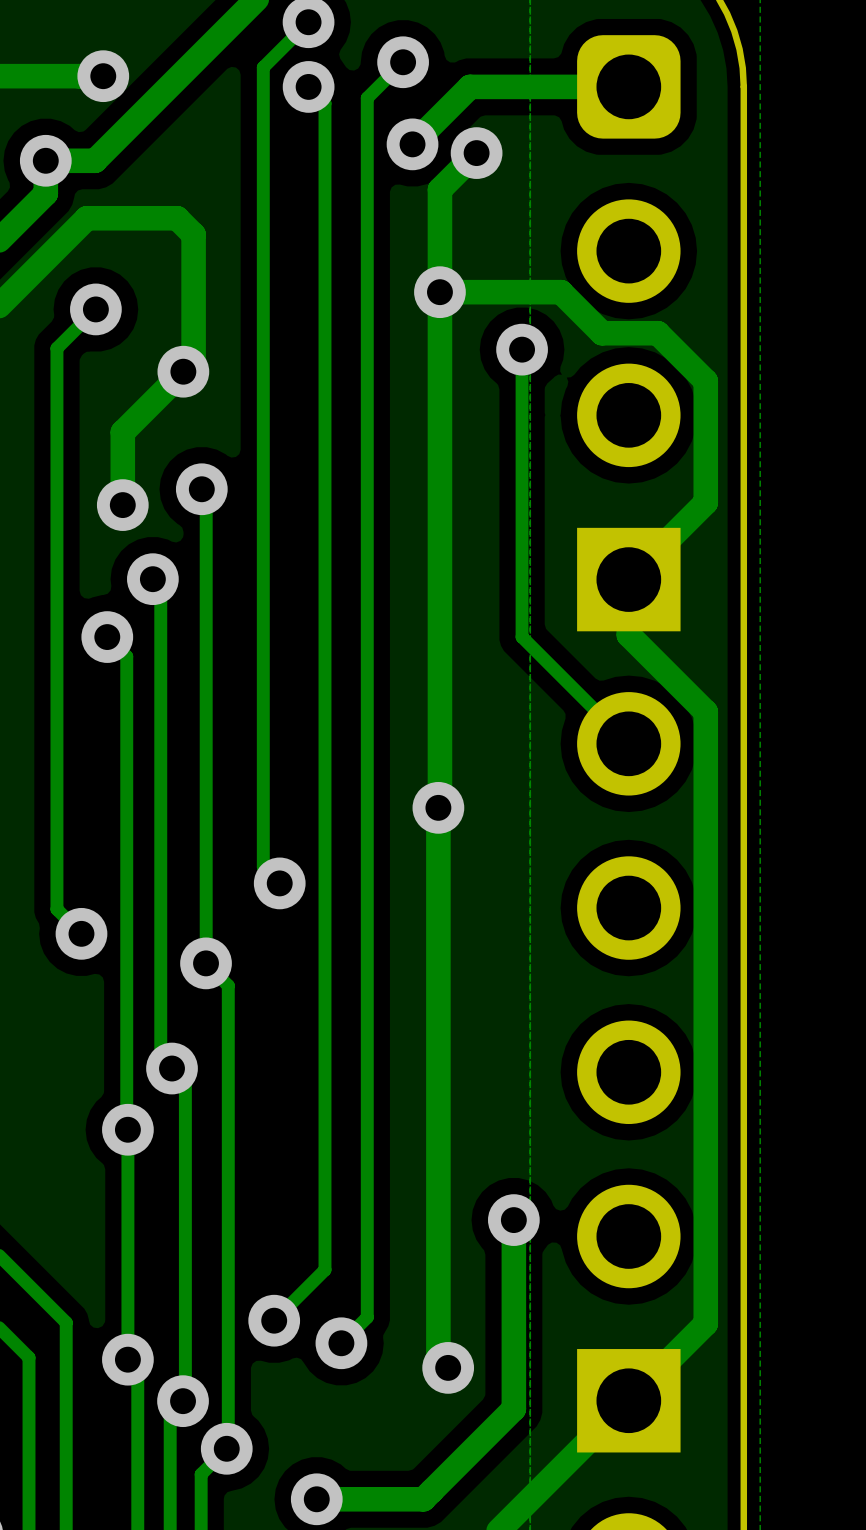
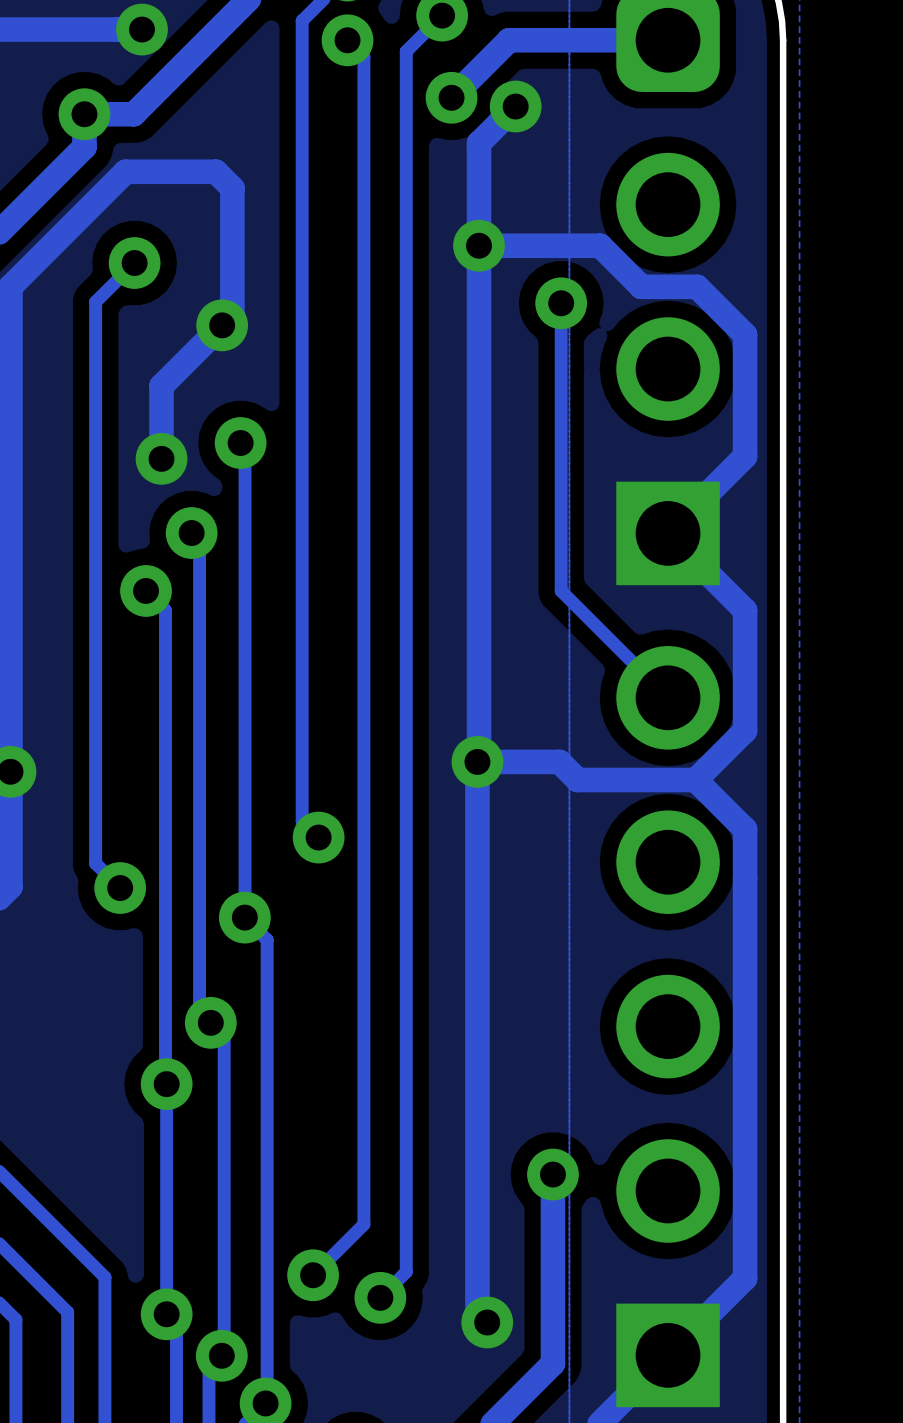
track: (628, 579) (628, 635) (705, 711) -> (668, 533) (745, 610) (745, 665)
track: (705, 776) (705, 875) -> (745, 730) (695, 780)
track: none -> (477, 761) (559, 761) (577, 780) (695, 780)
track: none -> (695, 780) (745, 829)

